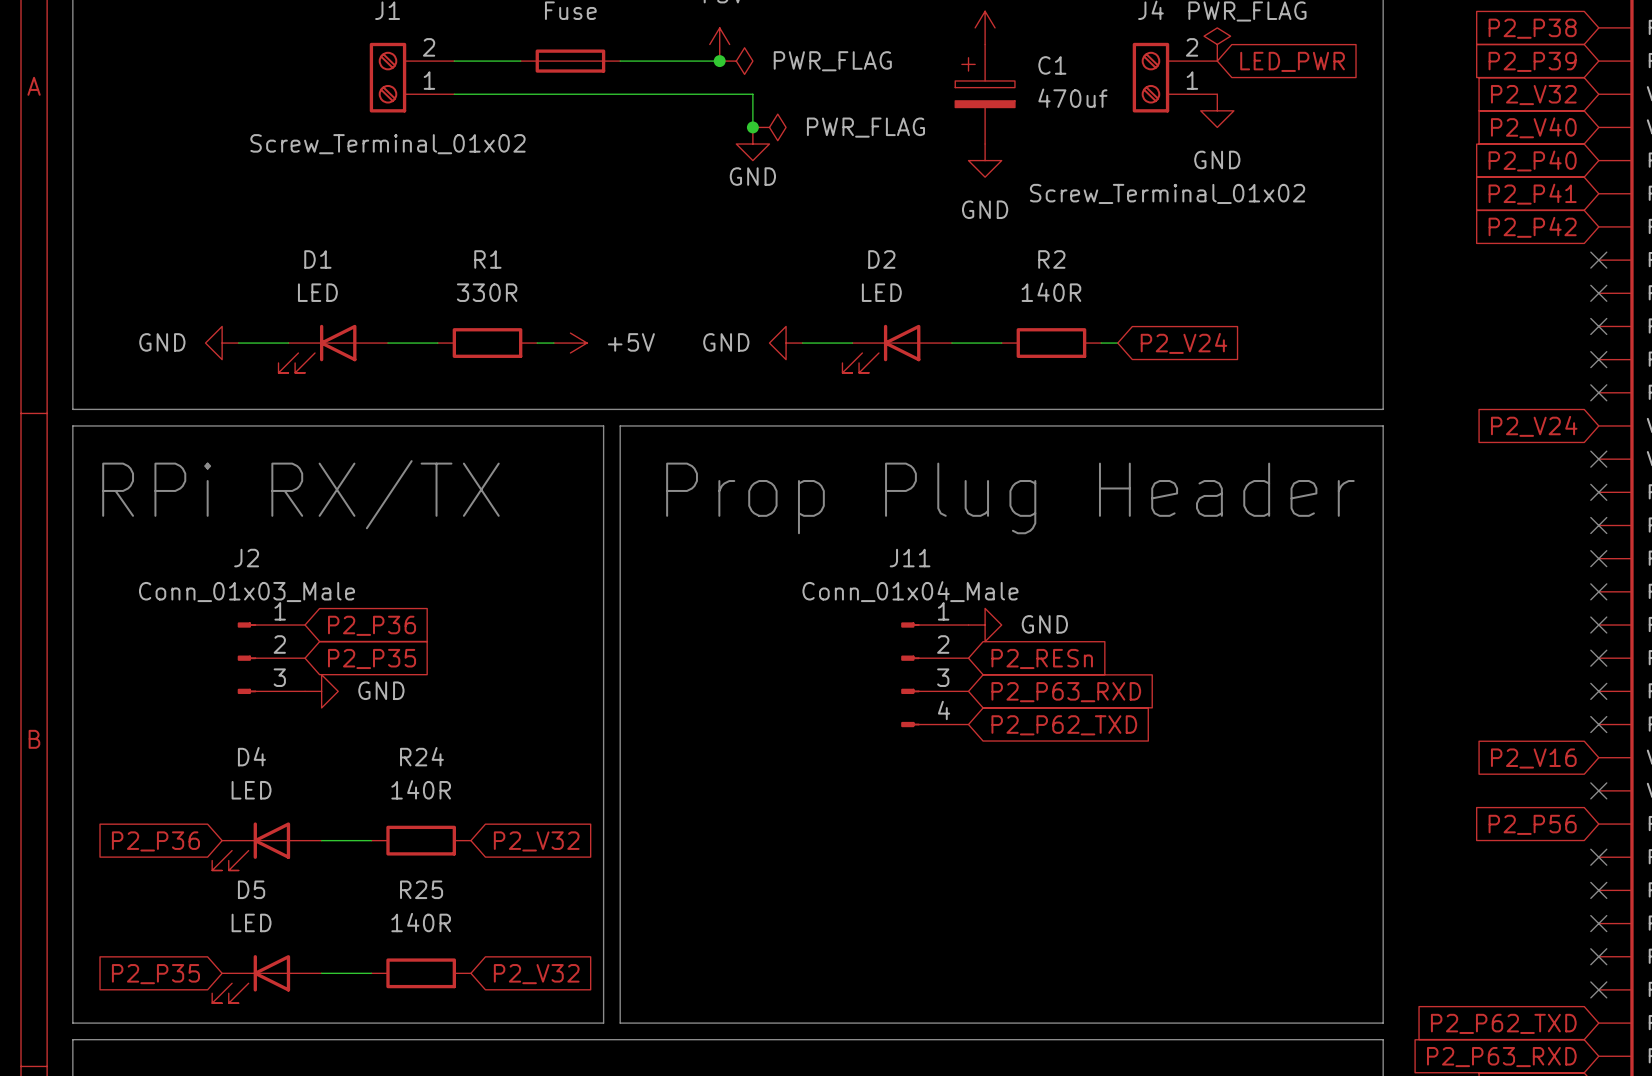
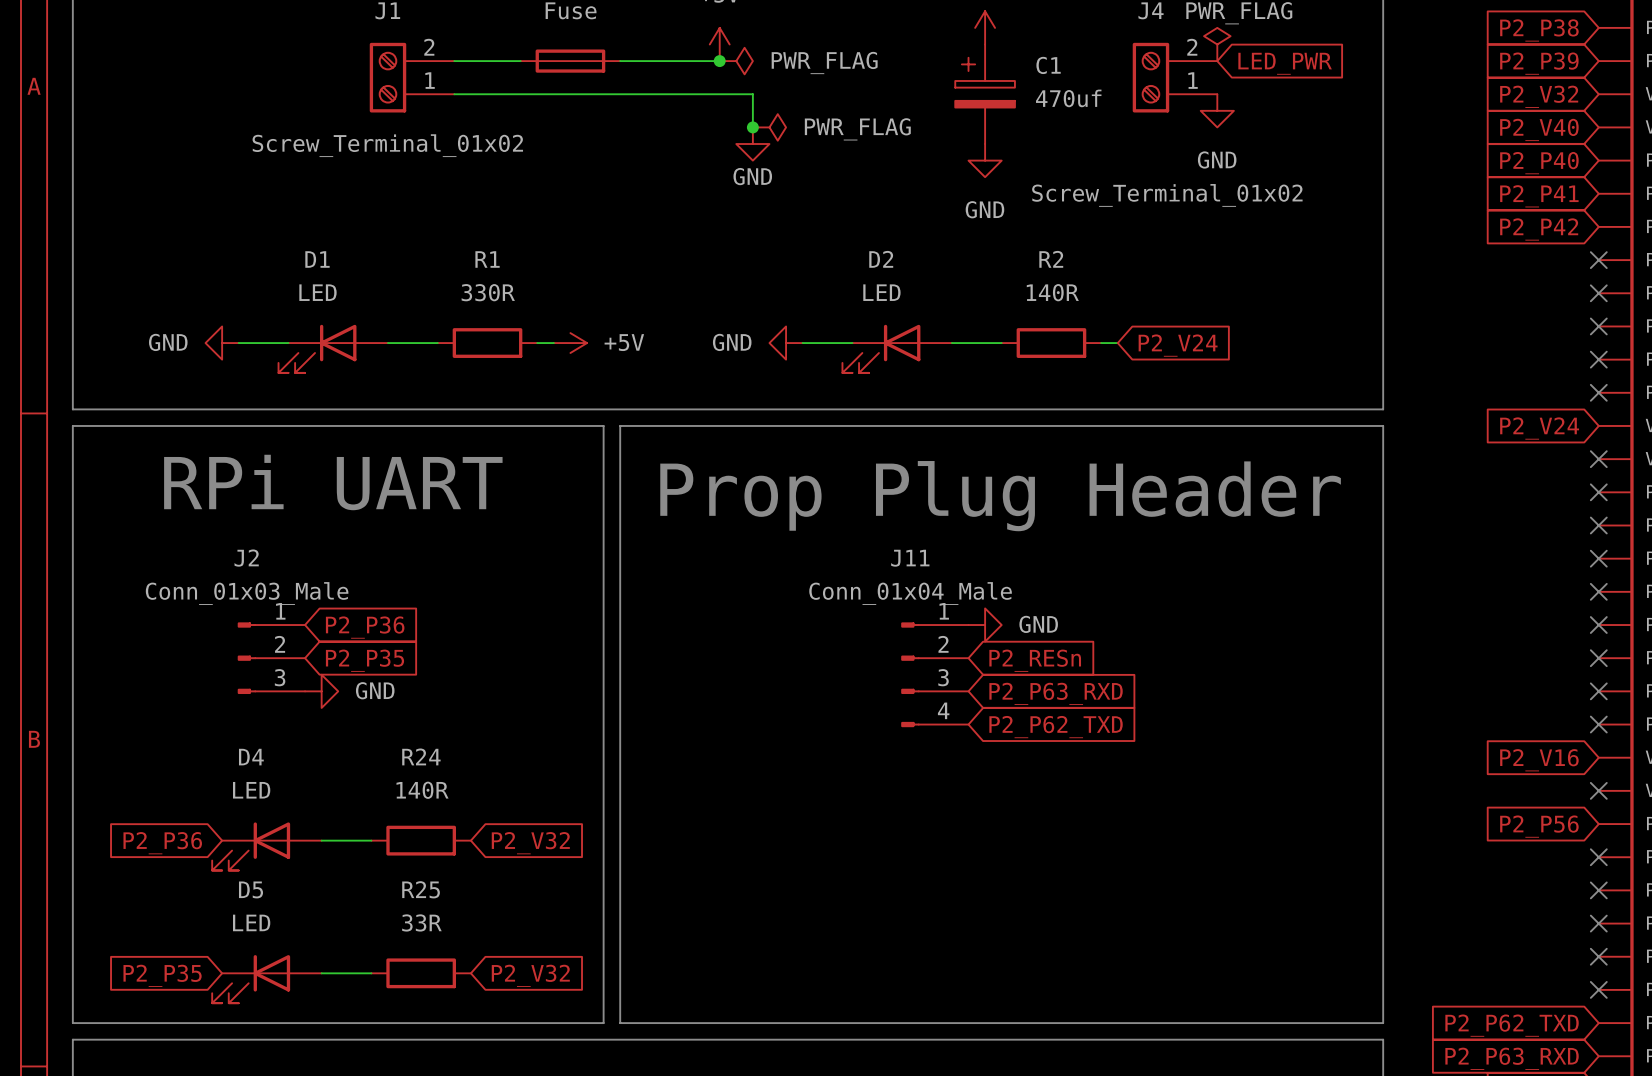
text: RPi RX/TX (300, 494) -> RPi UART (333, 482)
R25 value: 140R (421, 922) -> 33R (421, 922)

